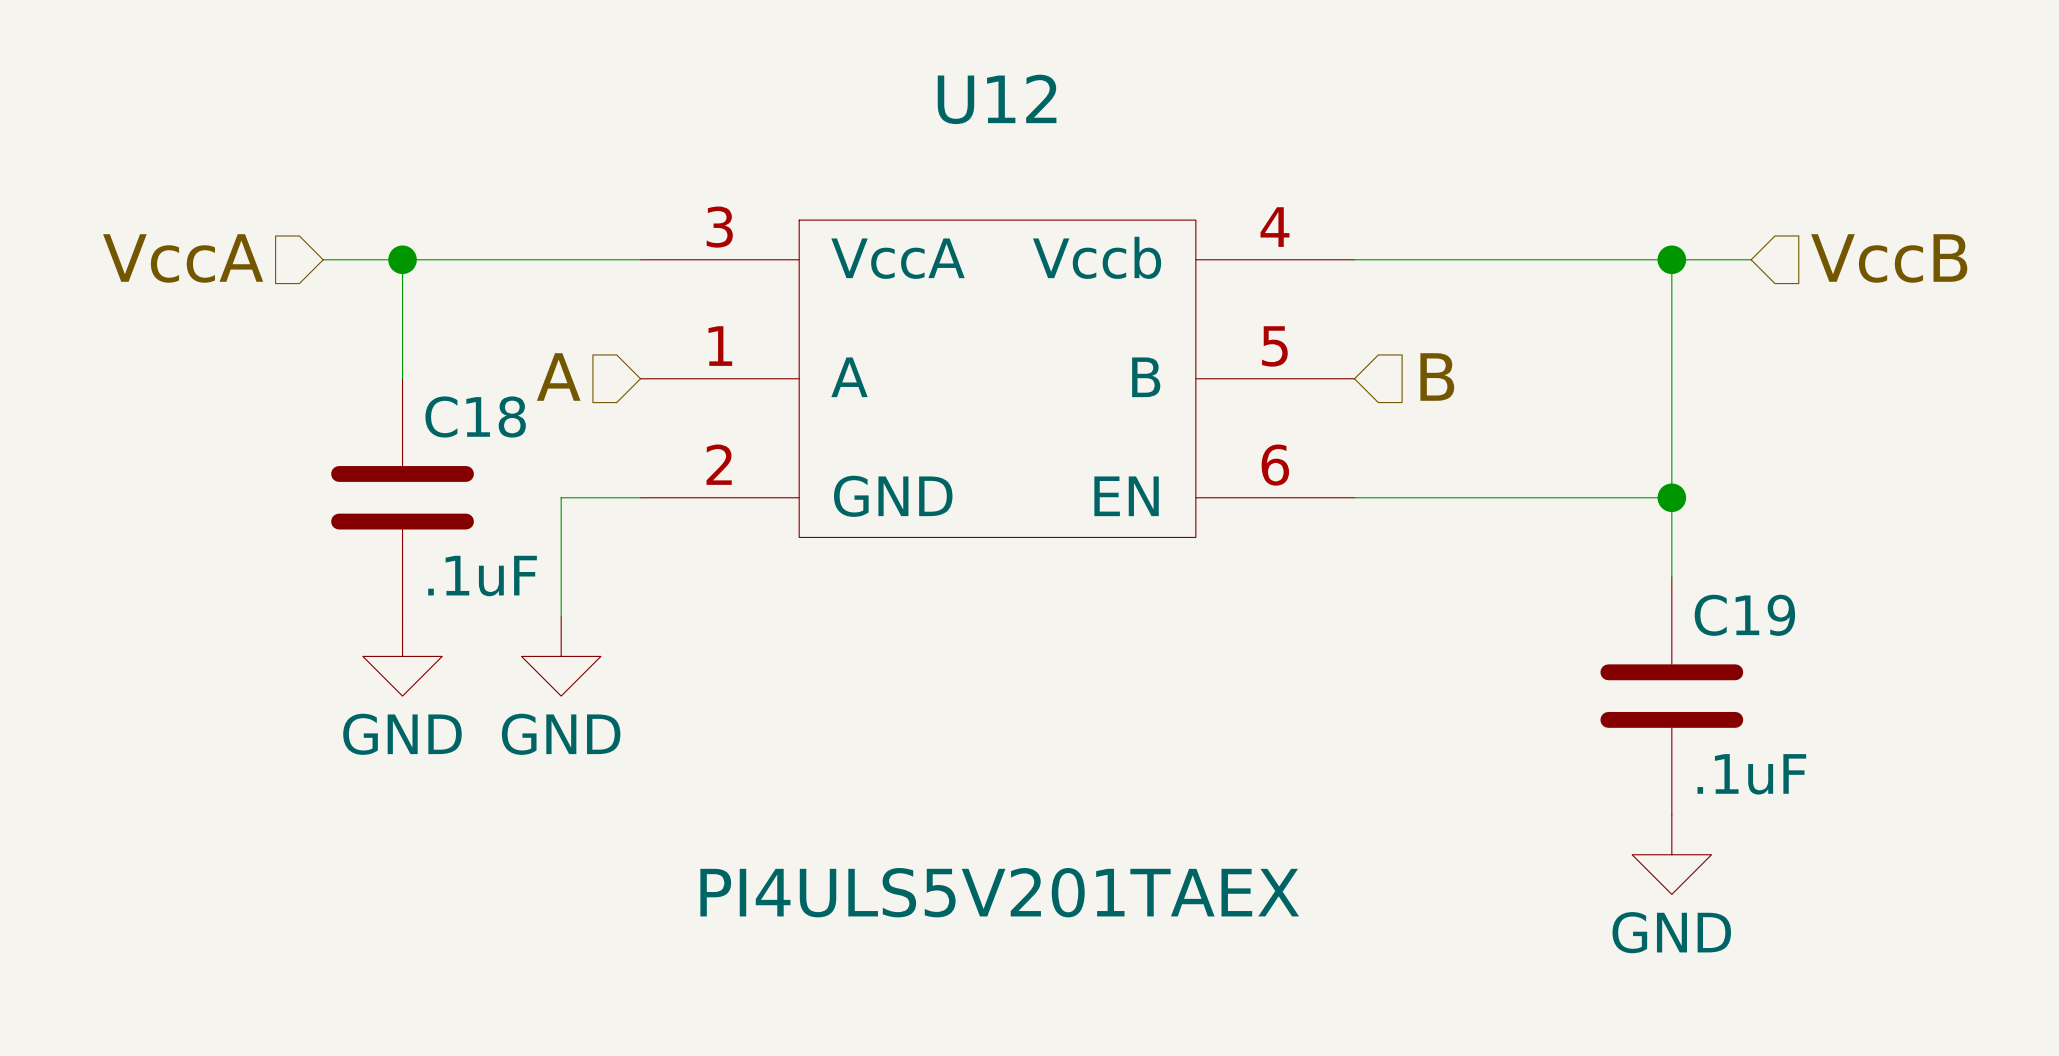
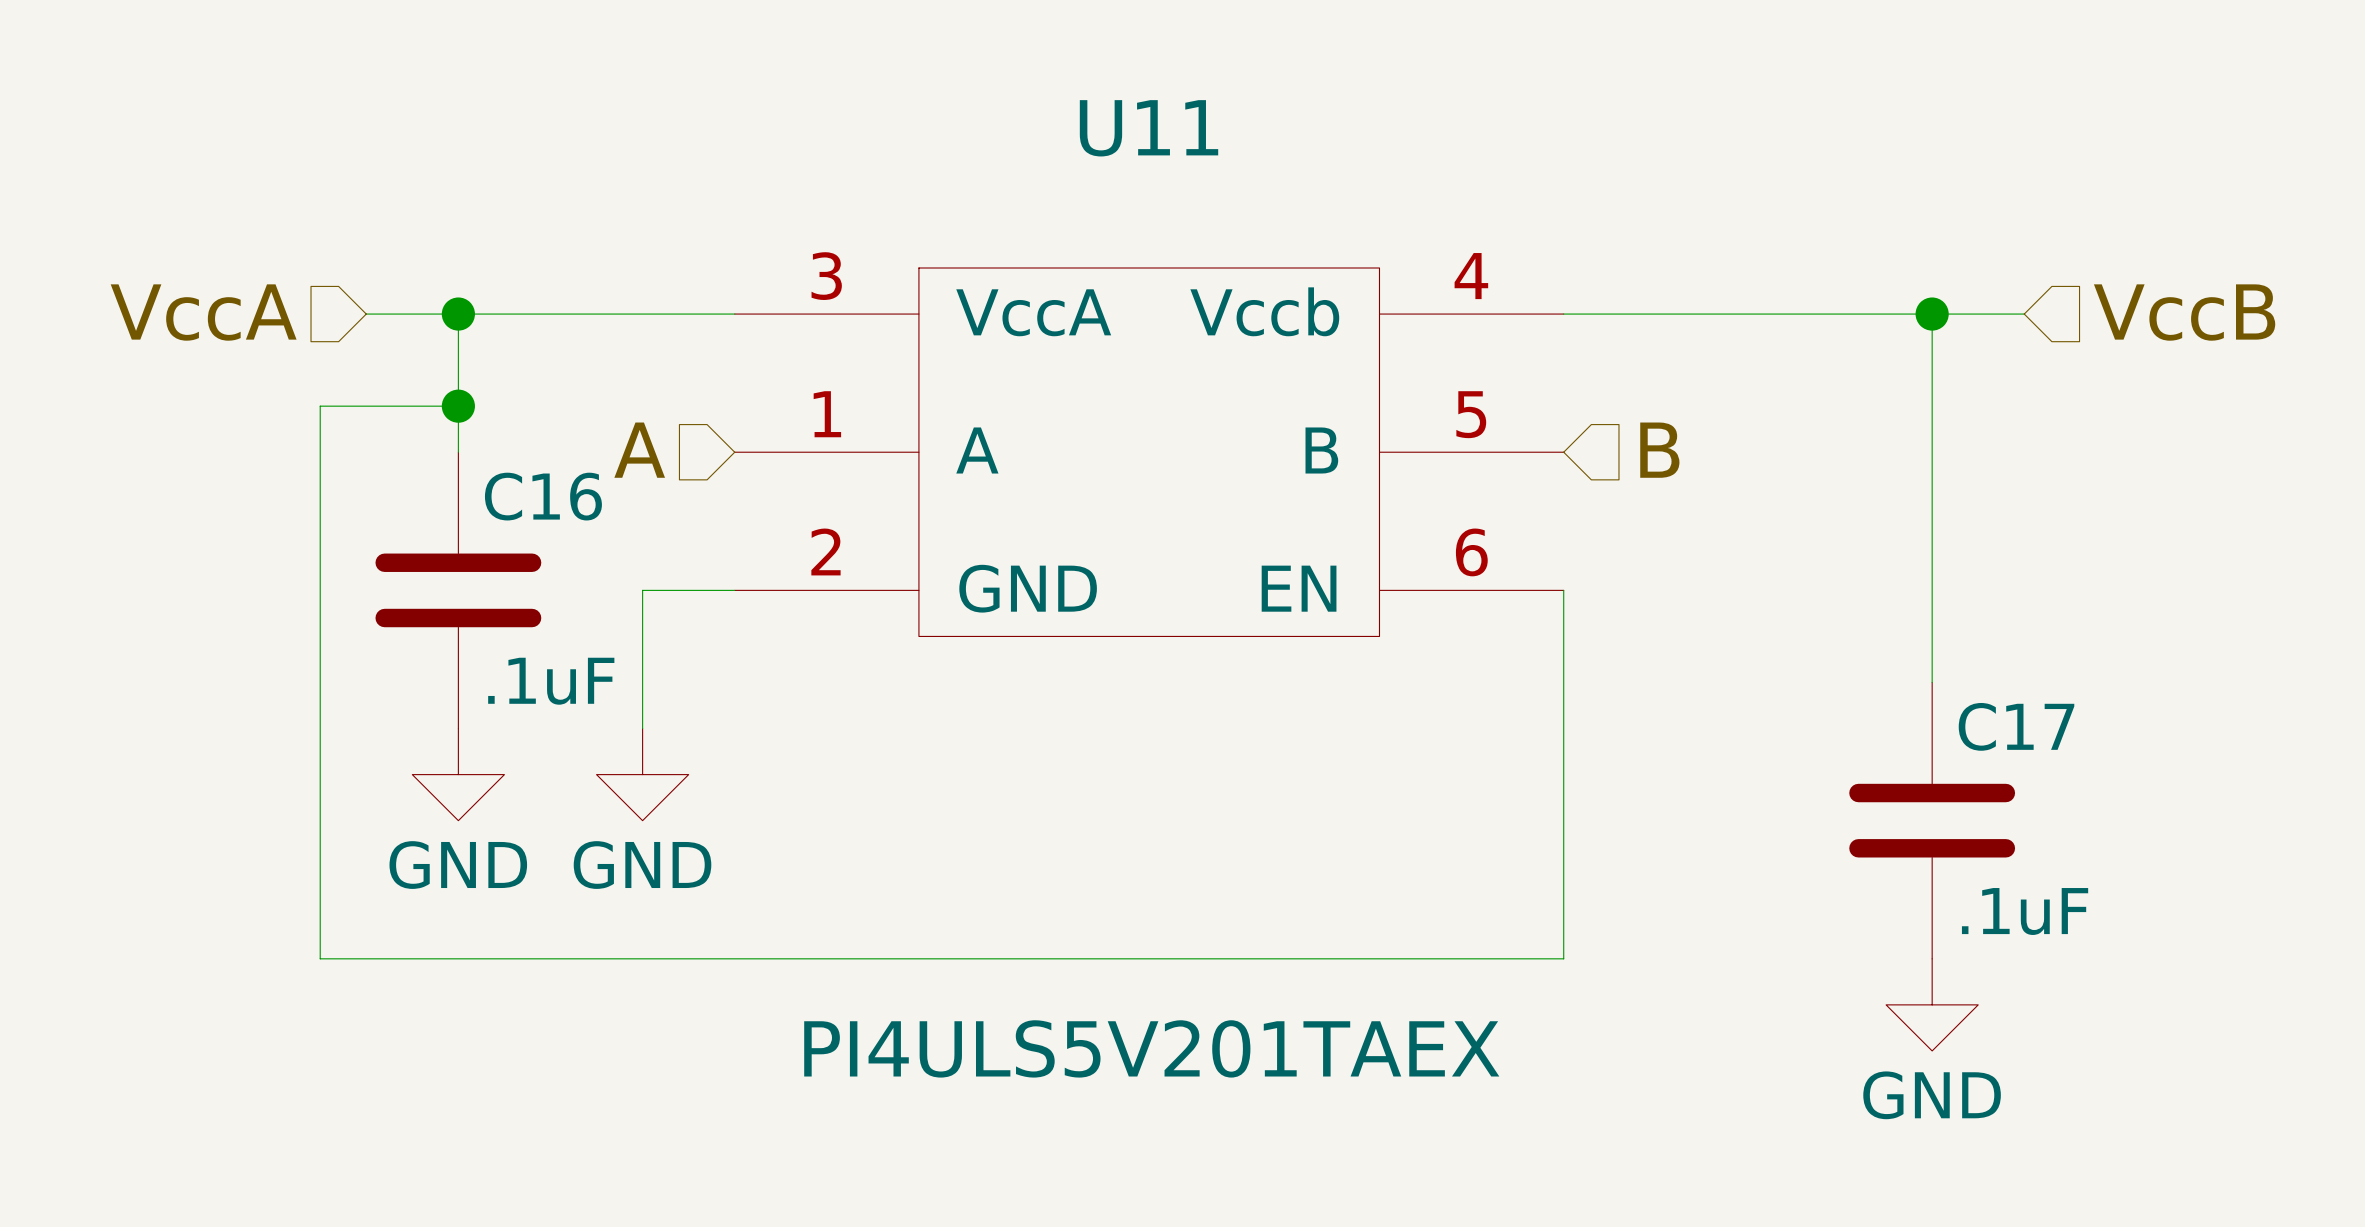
U12 name: U12 (997, 99) -> U11 (1149, 128)
junction: none -> (458, 406)
C18 name: C18 (475, 416) -> C16 (543, 496)
wire: (1354, 497) (1671, 497) -> (1563, 590) (1563, 958) (320, 958) (320, 406) (458, 406)
junction: (1671, 497) -> none
C19 name: C19 (1744, 615) -> C17 (2016, 726)

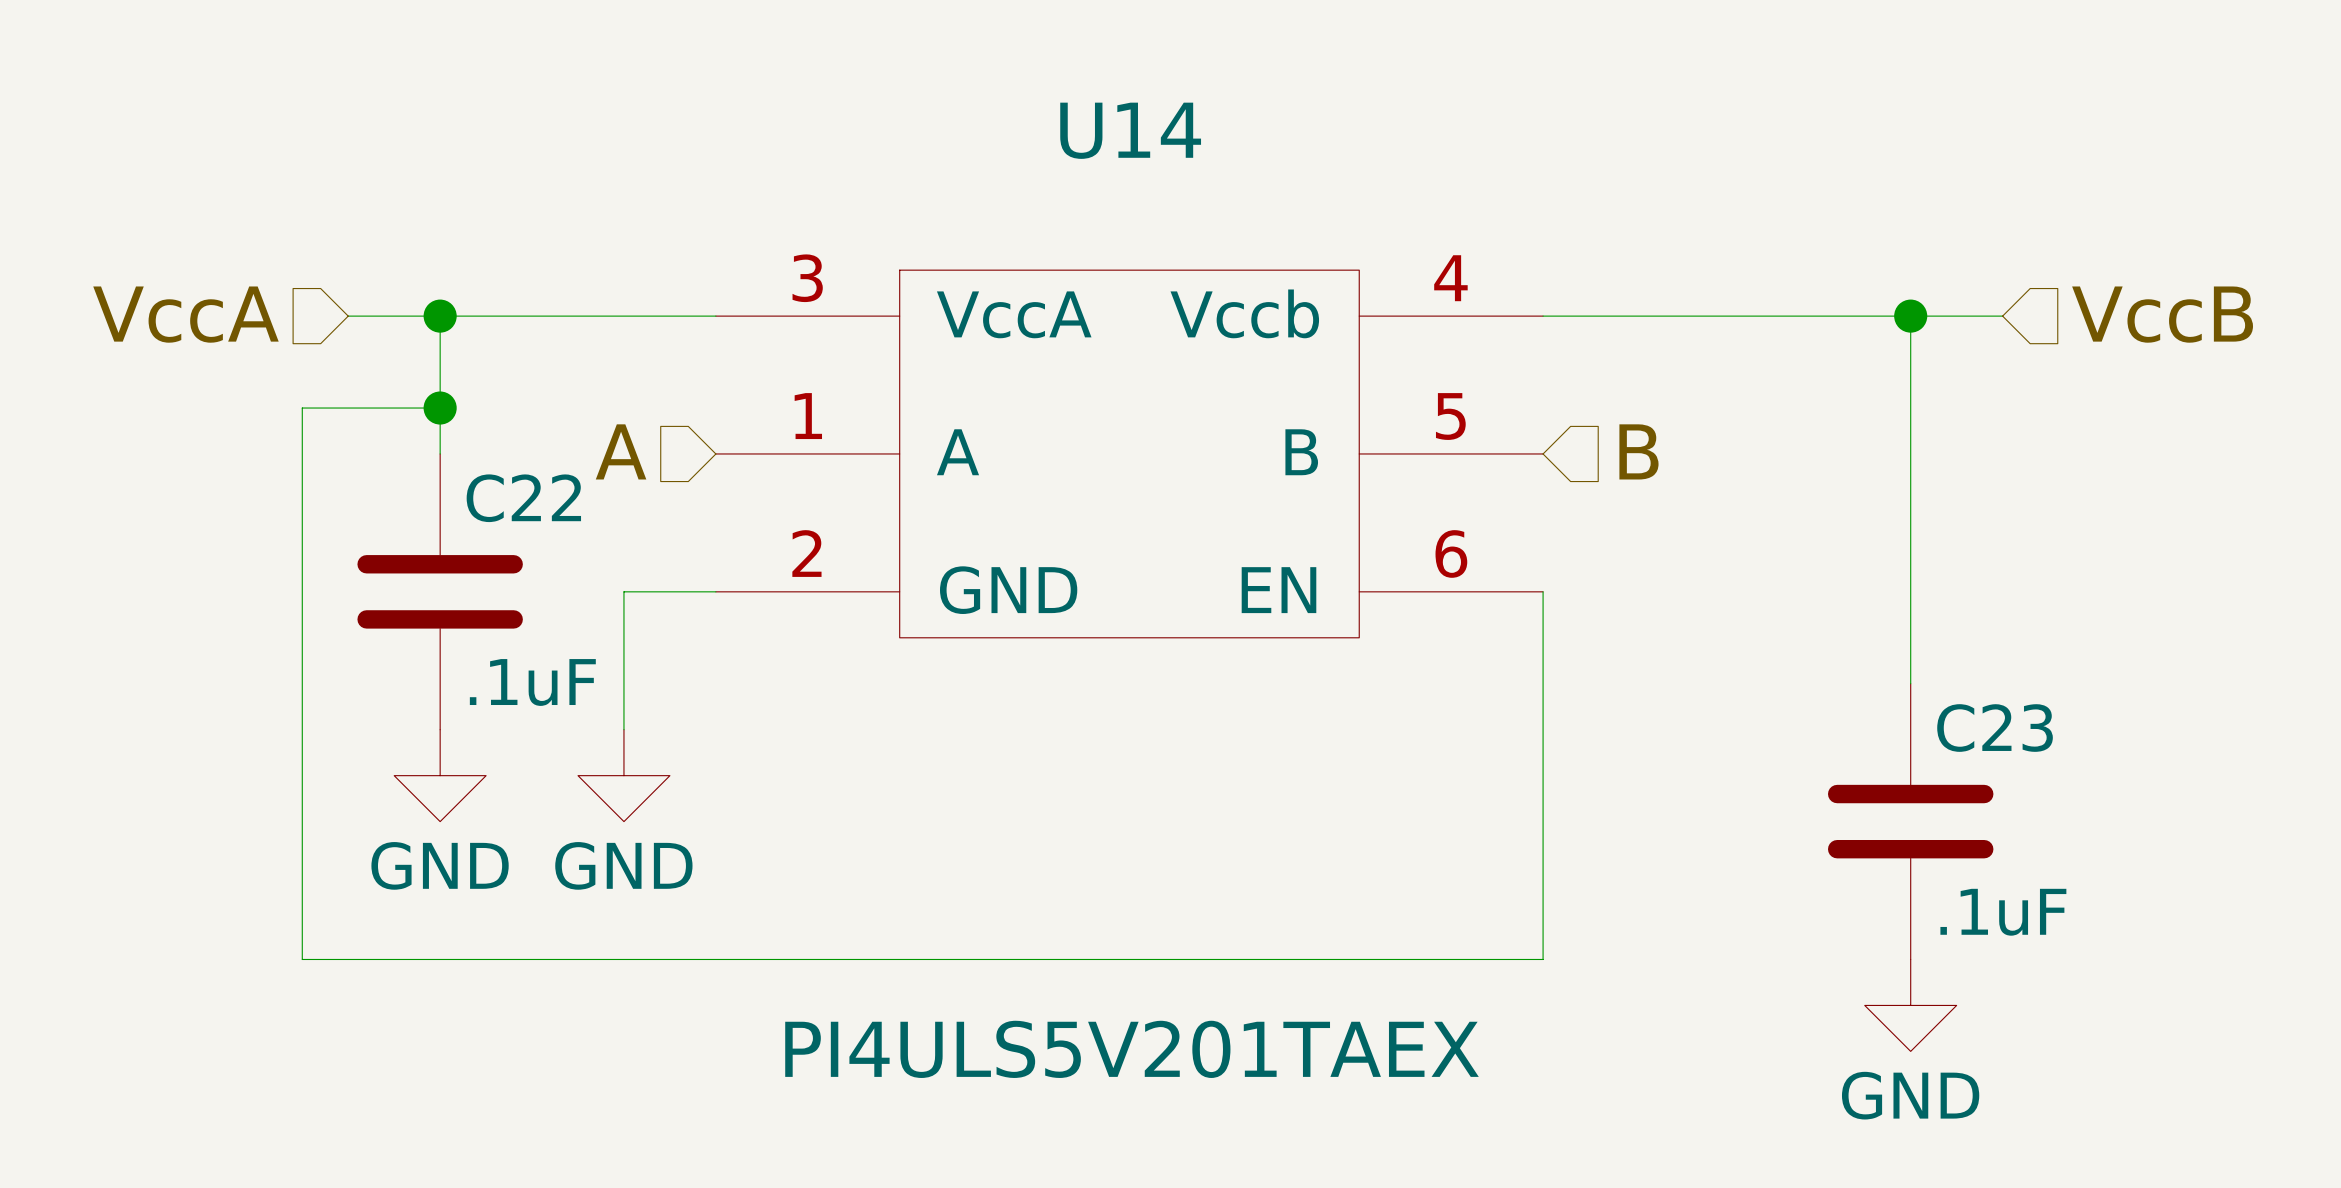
U11 name: U11 (1149, 128) -> U14 (1130, 130)
C16 name: C16 (543, 496) -> C22 (523, 498)
C17 name: C17 (2016, 726) -> C23 (1995, 728)

